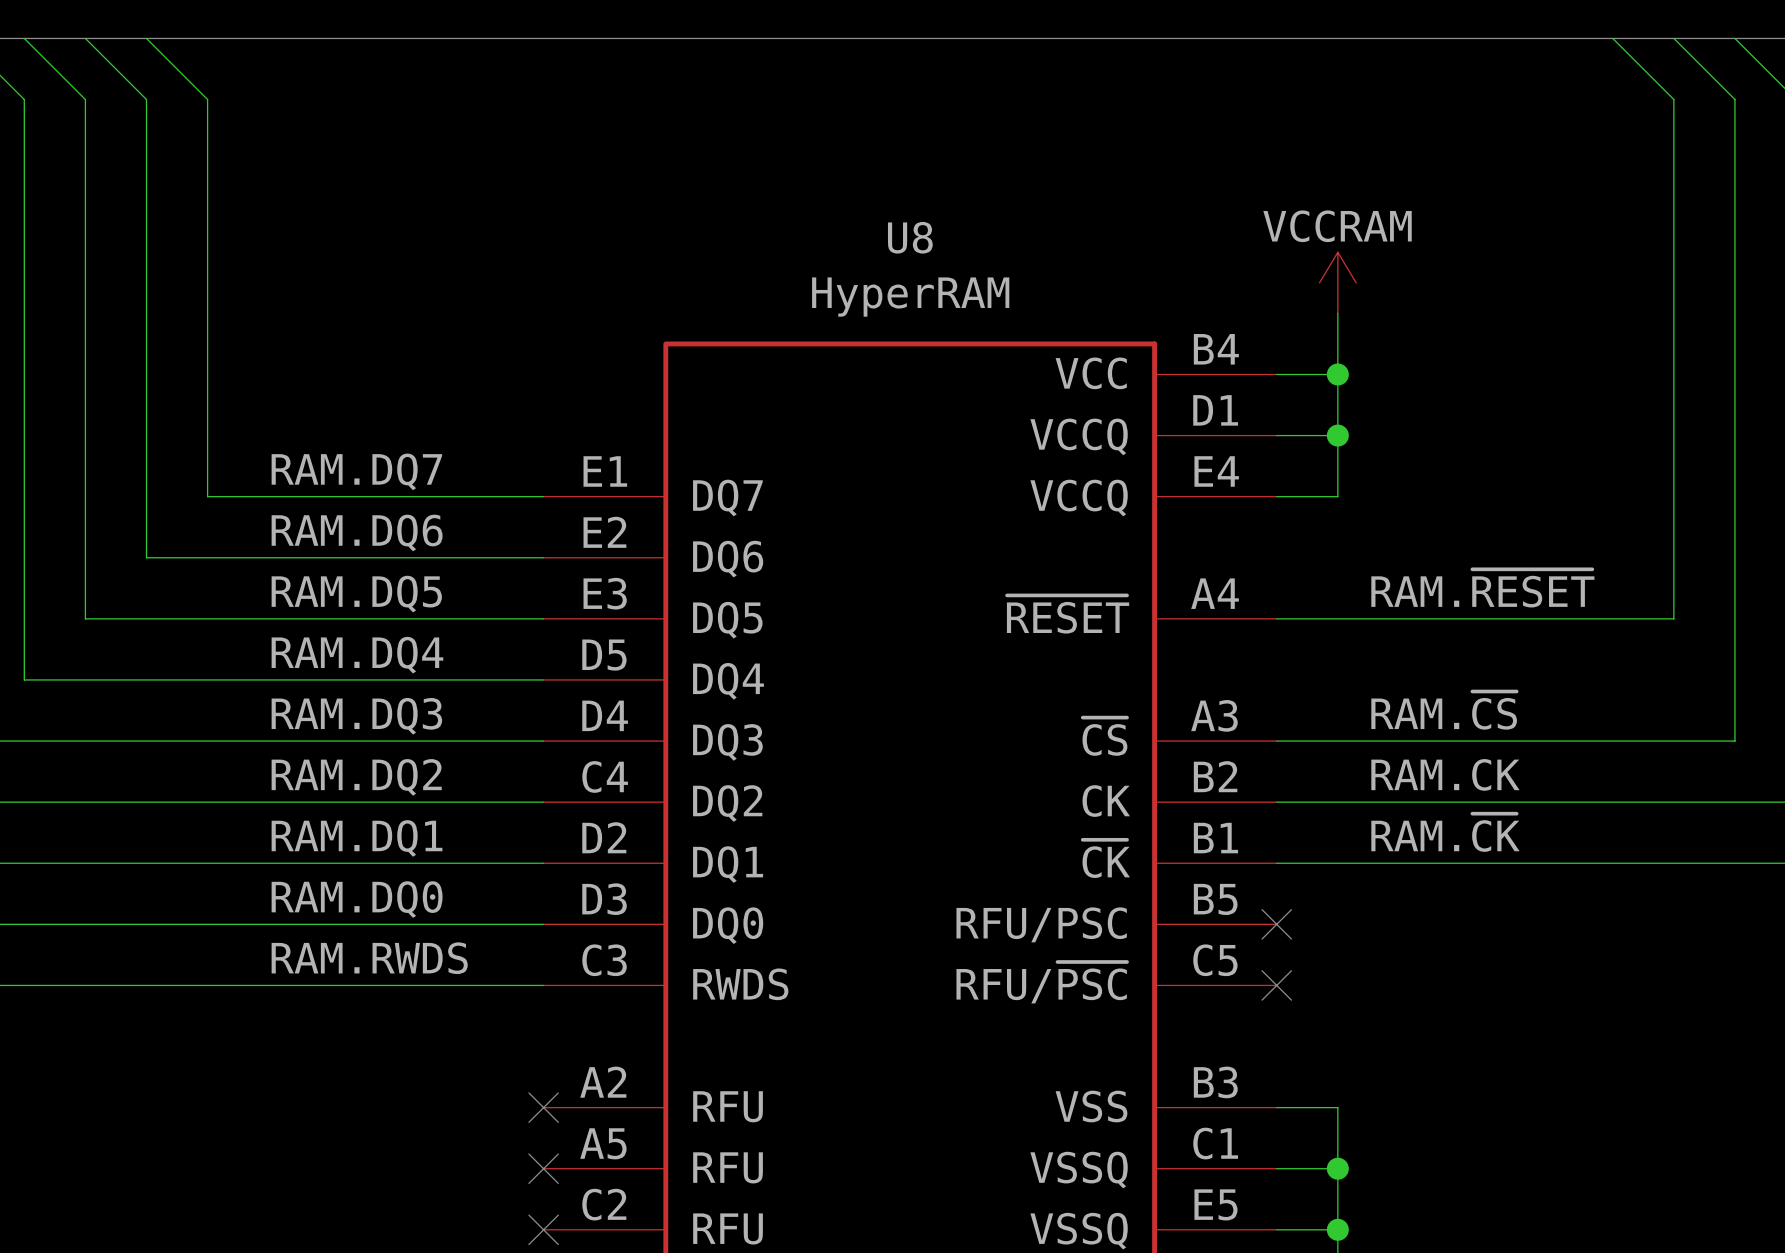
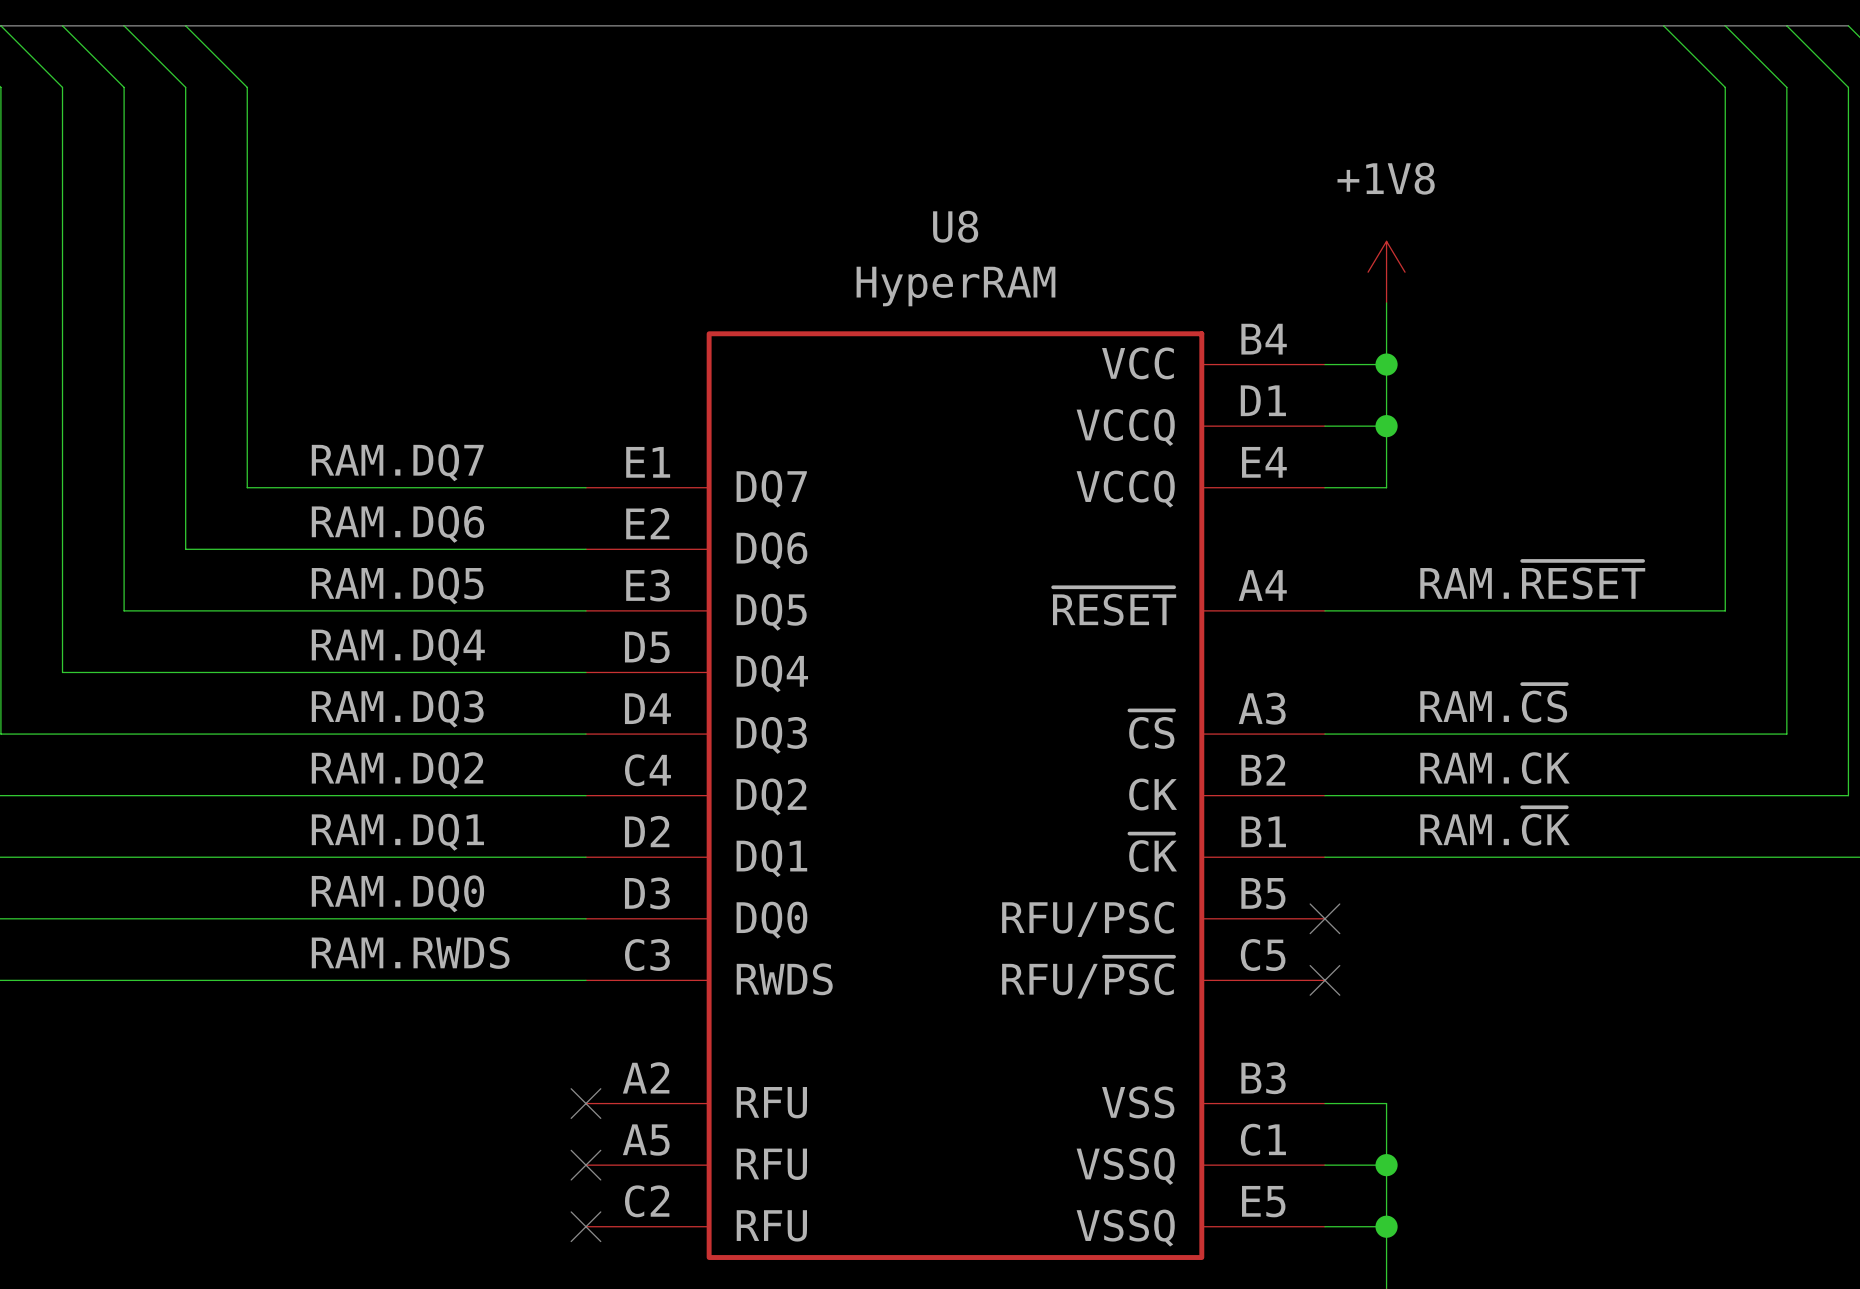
power symbol: VCCRAM (1337, 282) -> +1V8 (1386, 272)

